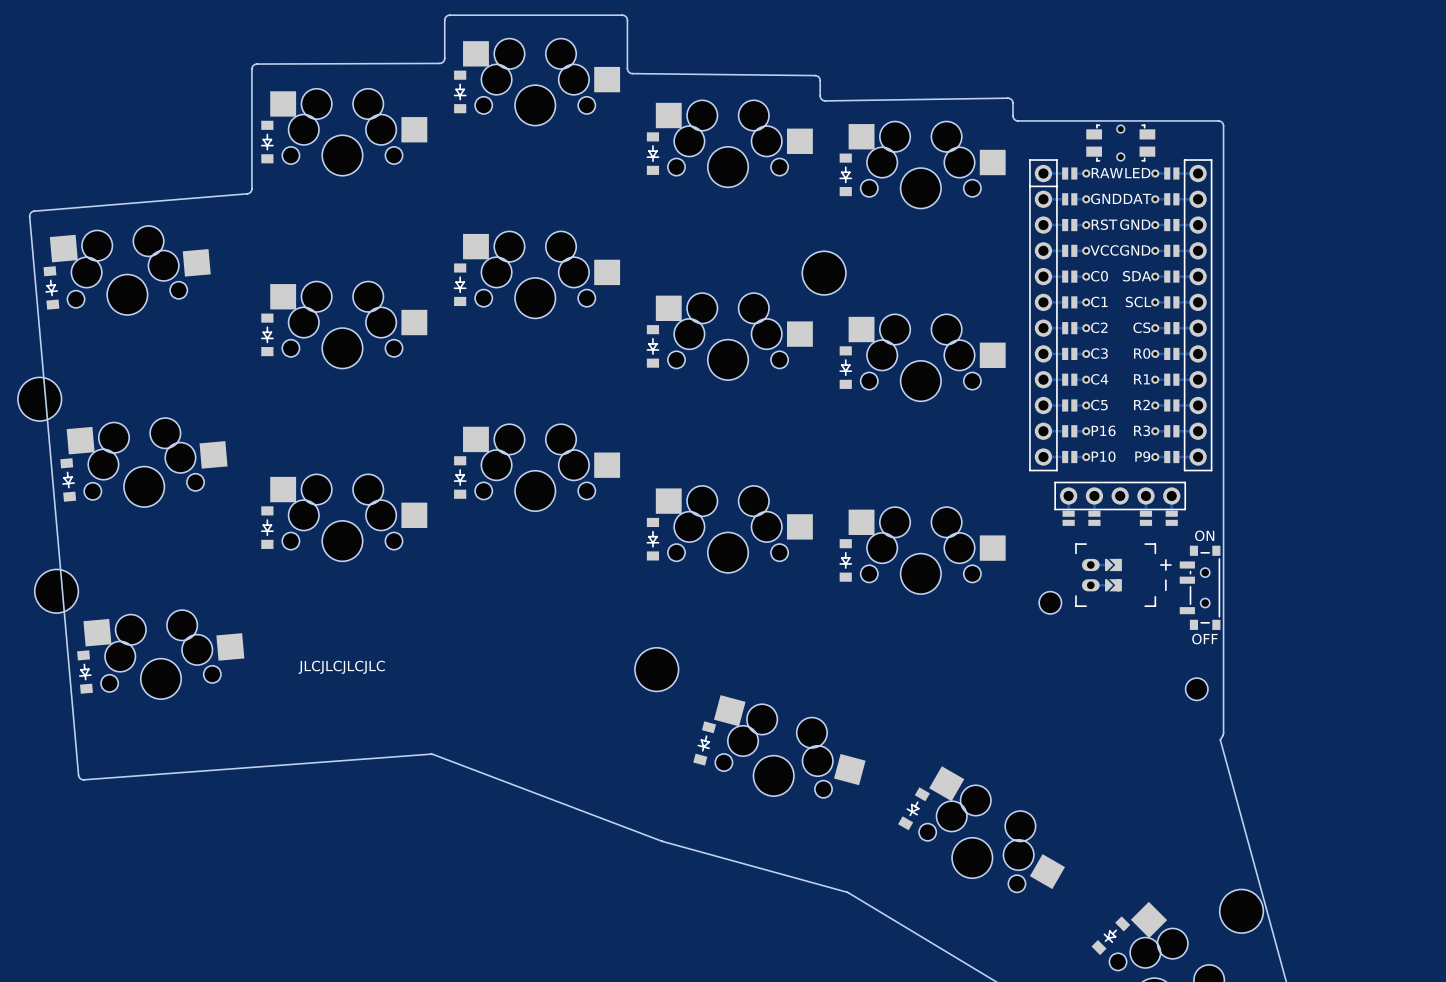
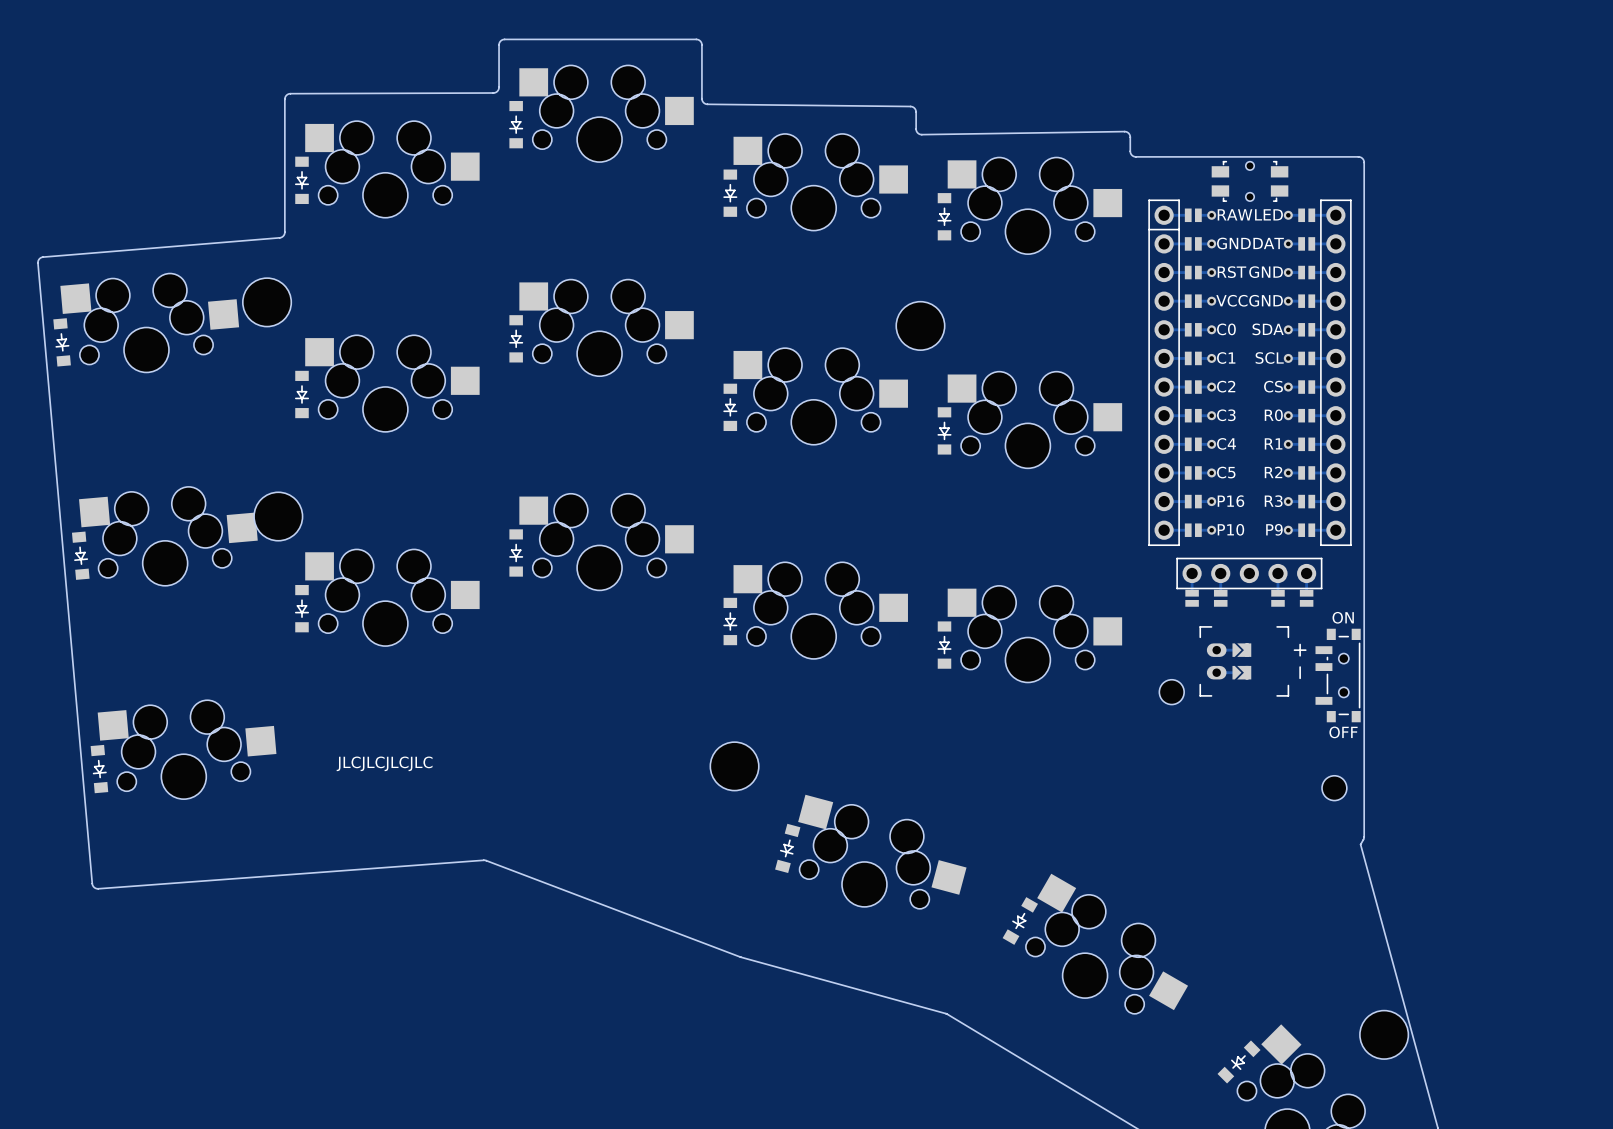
part: none -> (267, 302)
part: (39, 399) -> none
part: none -> (278, 516)
part: (56, 591) -> none

